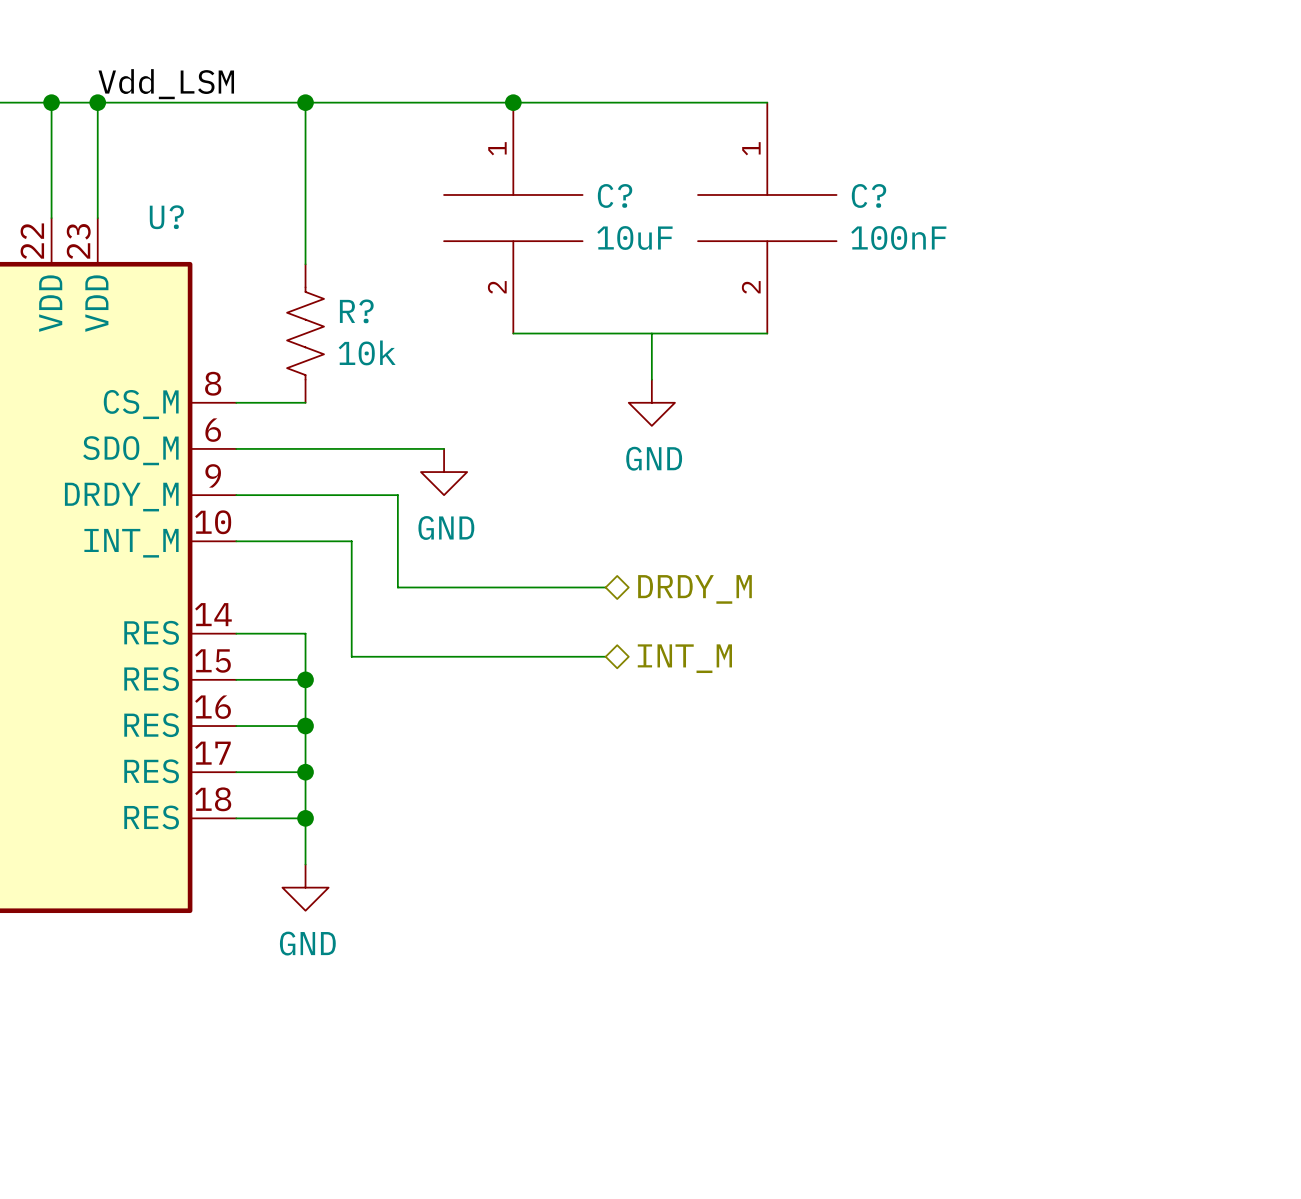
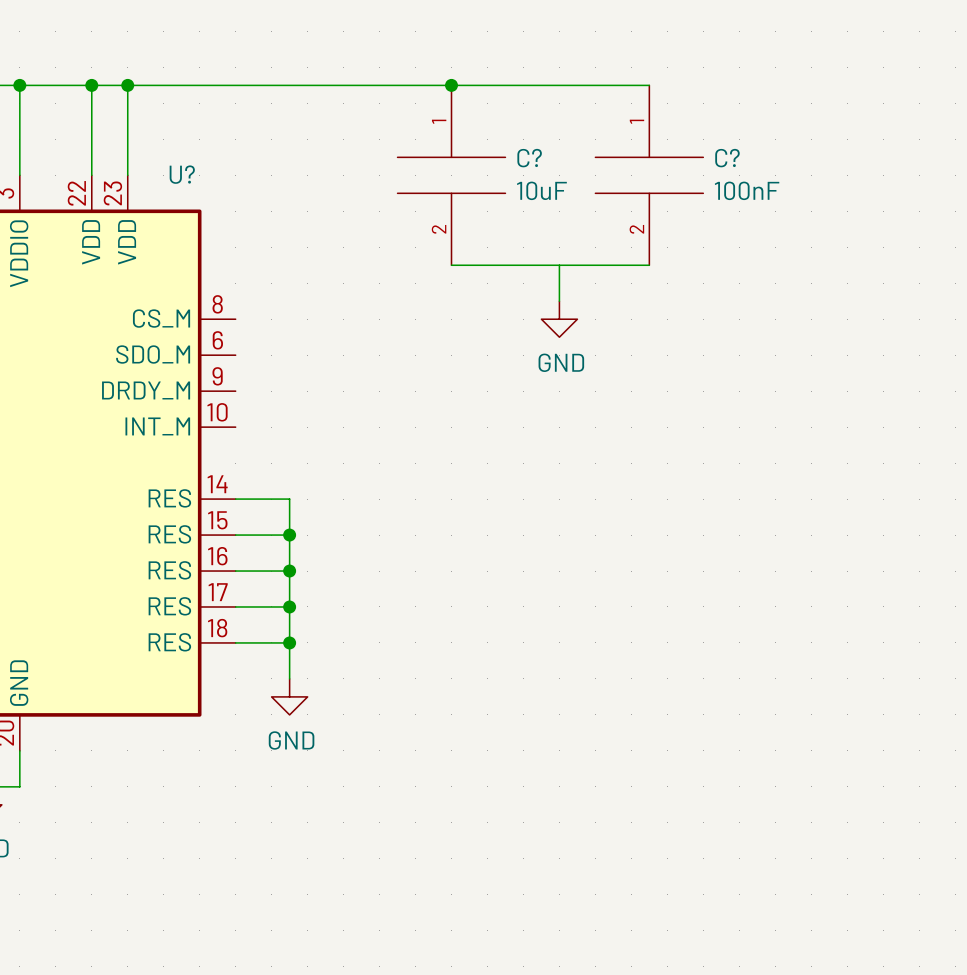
label: Vdd_LSM (166, 84) -> none
wire: (305, 102) (305, 264) -> none
junction: (305, 102) -> none
R?: 10k (305, 333) -> none
wire: (236, 402) (305, 402) -> none
wire: (236, 448) (444, 448) -> none
power symbol: GND (444, 472) -> none
wire: (236, 495) (397, 495) (397, 587) (605, 587) -> none
wire: (236, 541) (351, 541) (351, 656) (605, 656) -> none
hierarchical label: DRDY_M (694, 589) -> none
hierarchical label: INT_M (684, 658) -> none

